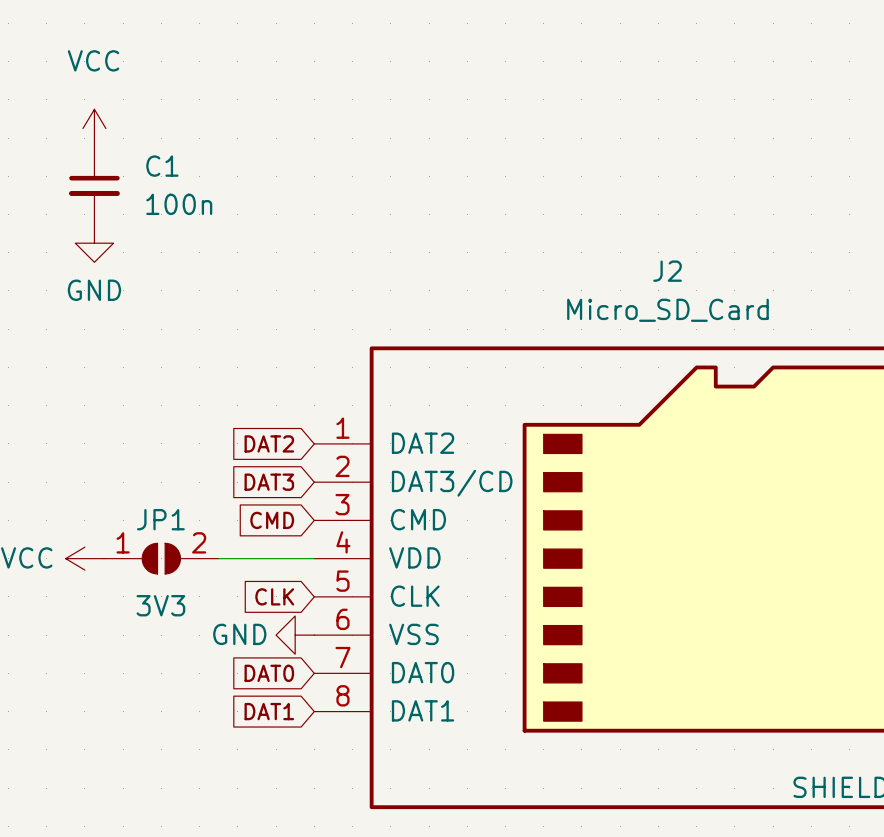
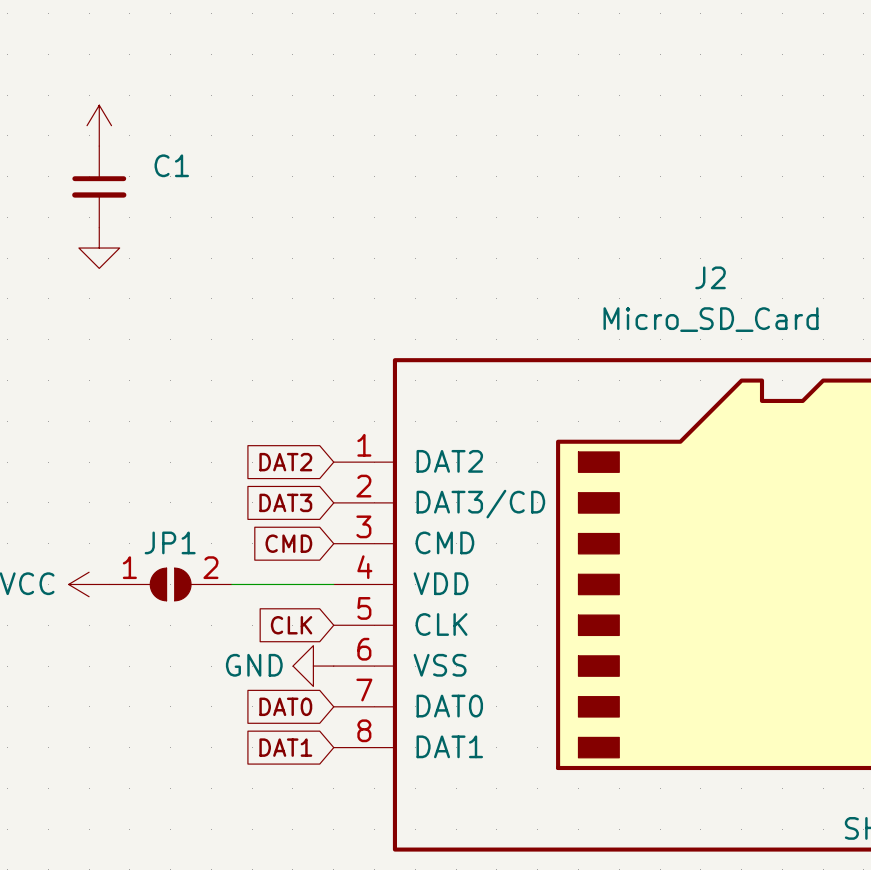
power symbol text: VCC (93, 60) -> none
C1 value: 100n (179, 204) -> none
power symbol text: GND (94, 290) -> none
JP1 value: 3V3 (160, 605) -> none

